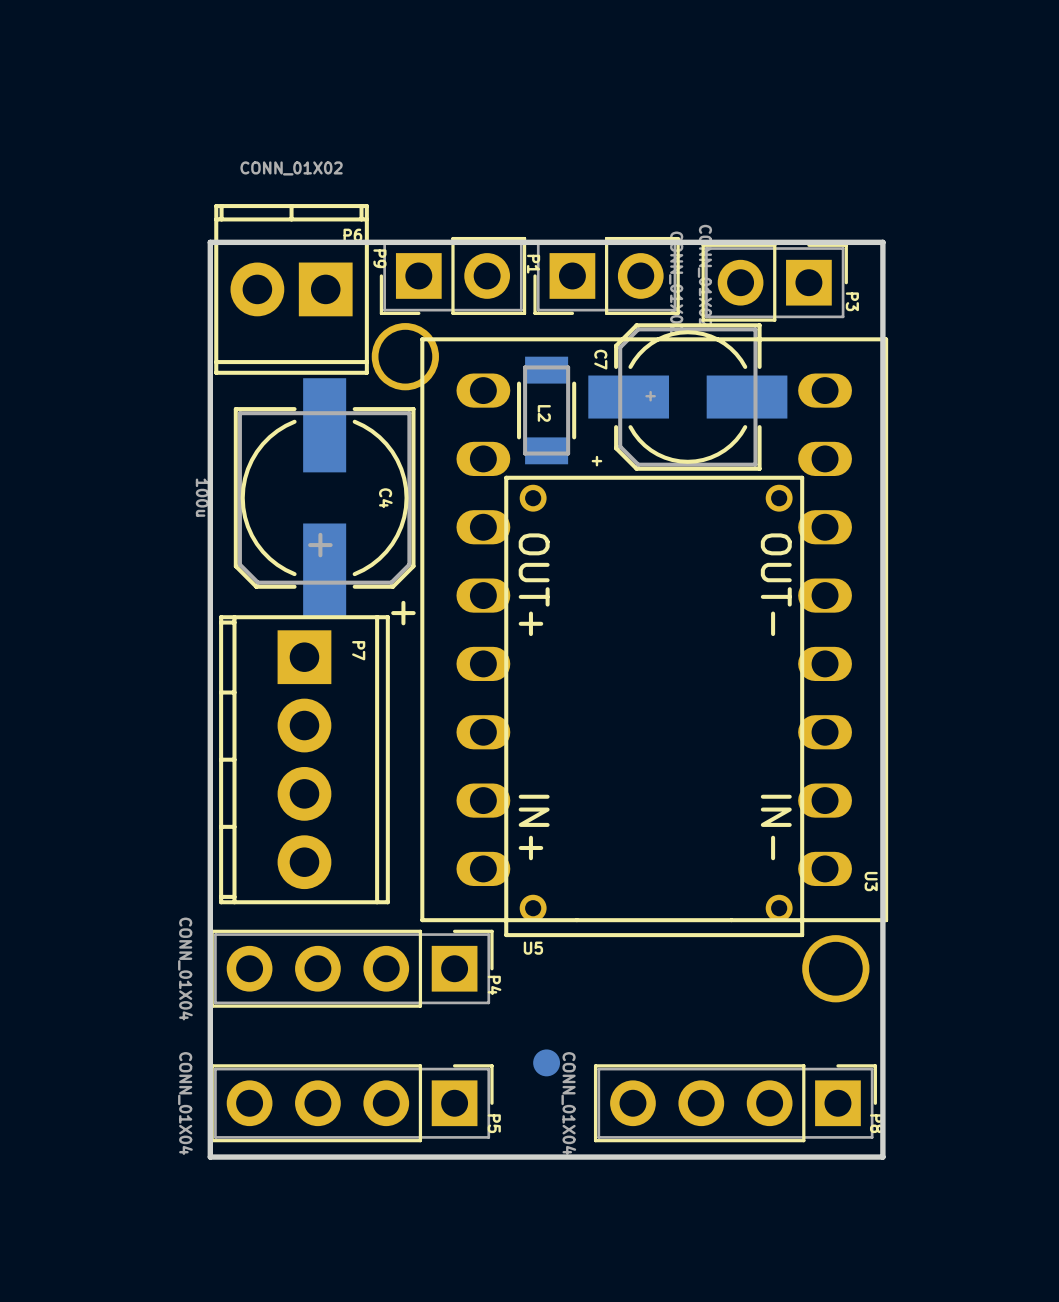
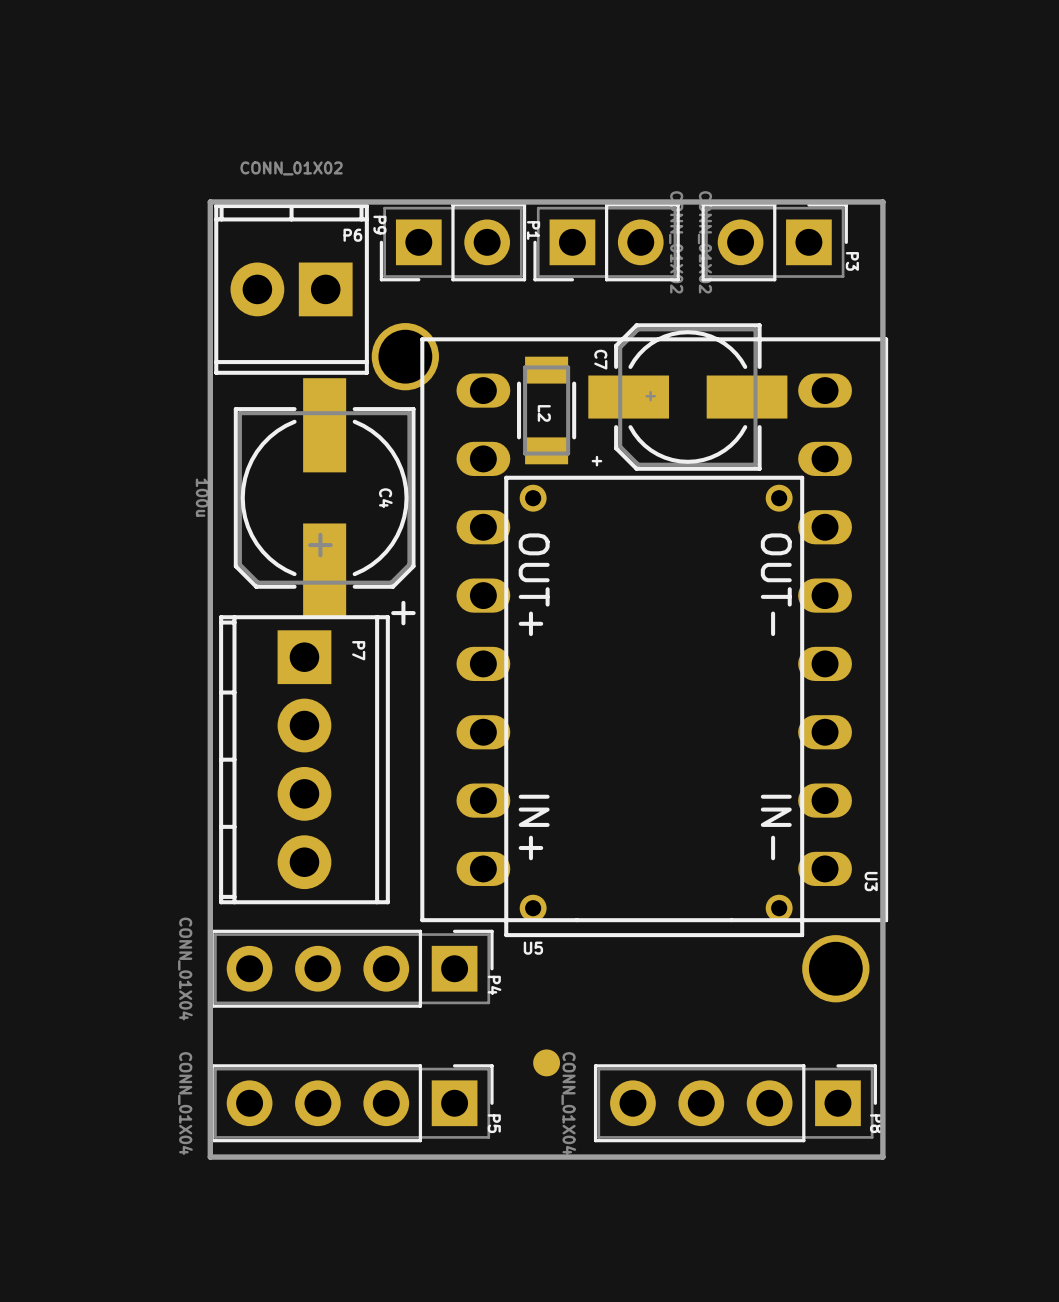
board edge: (882, 242) (210, 242) -> (882, 242) (882, 201) (210, 201) (210, 242)
P9 position: (452, 275) -> (452, 242)
P1 position: (606, 275) -> (606, 242)
P3 position: (774, 282) -> (774, 242)

